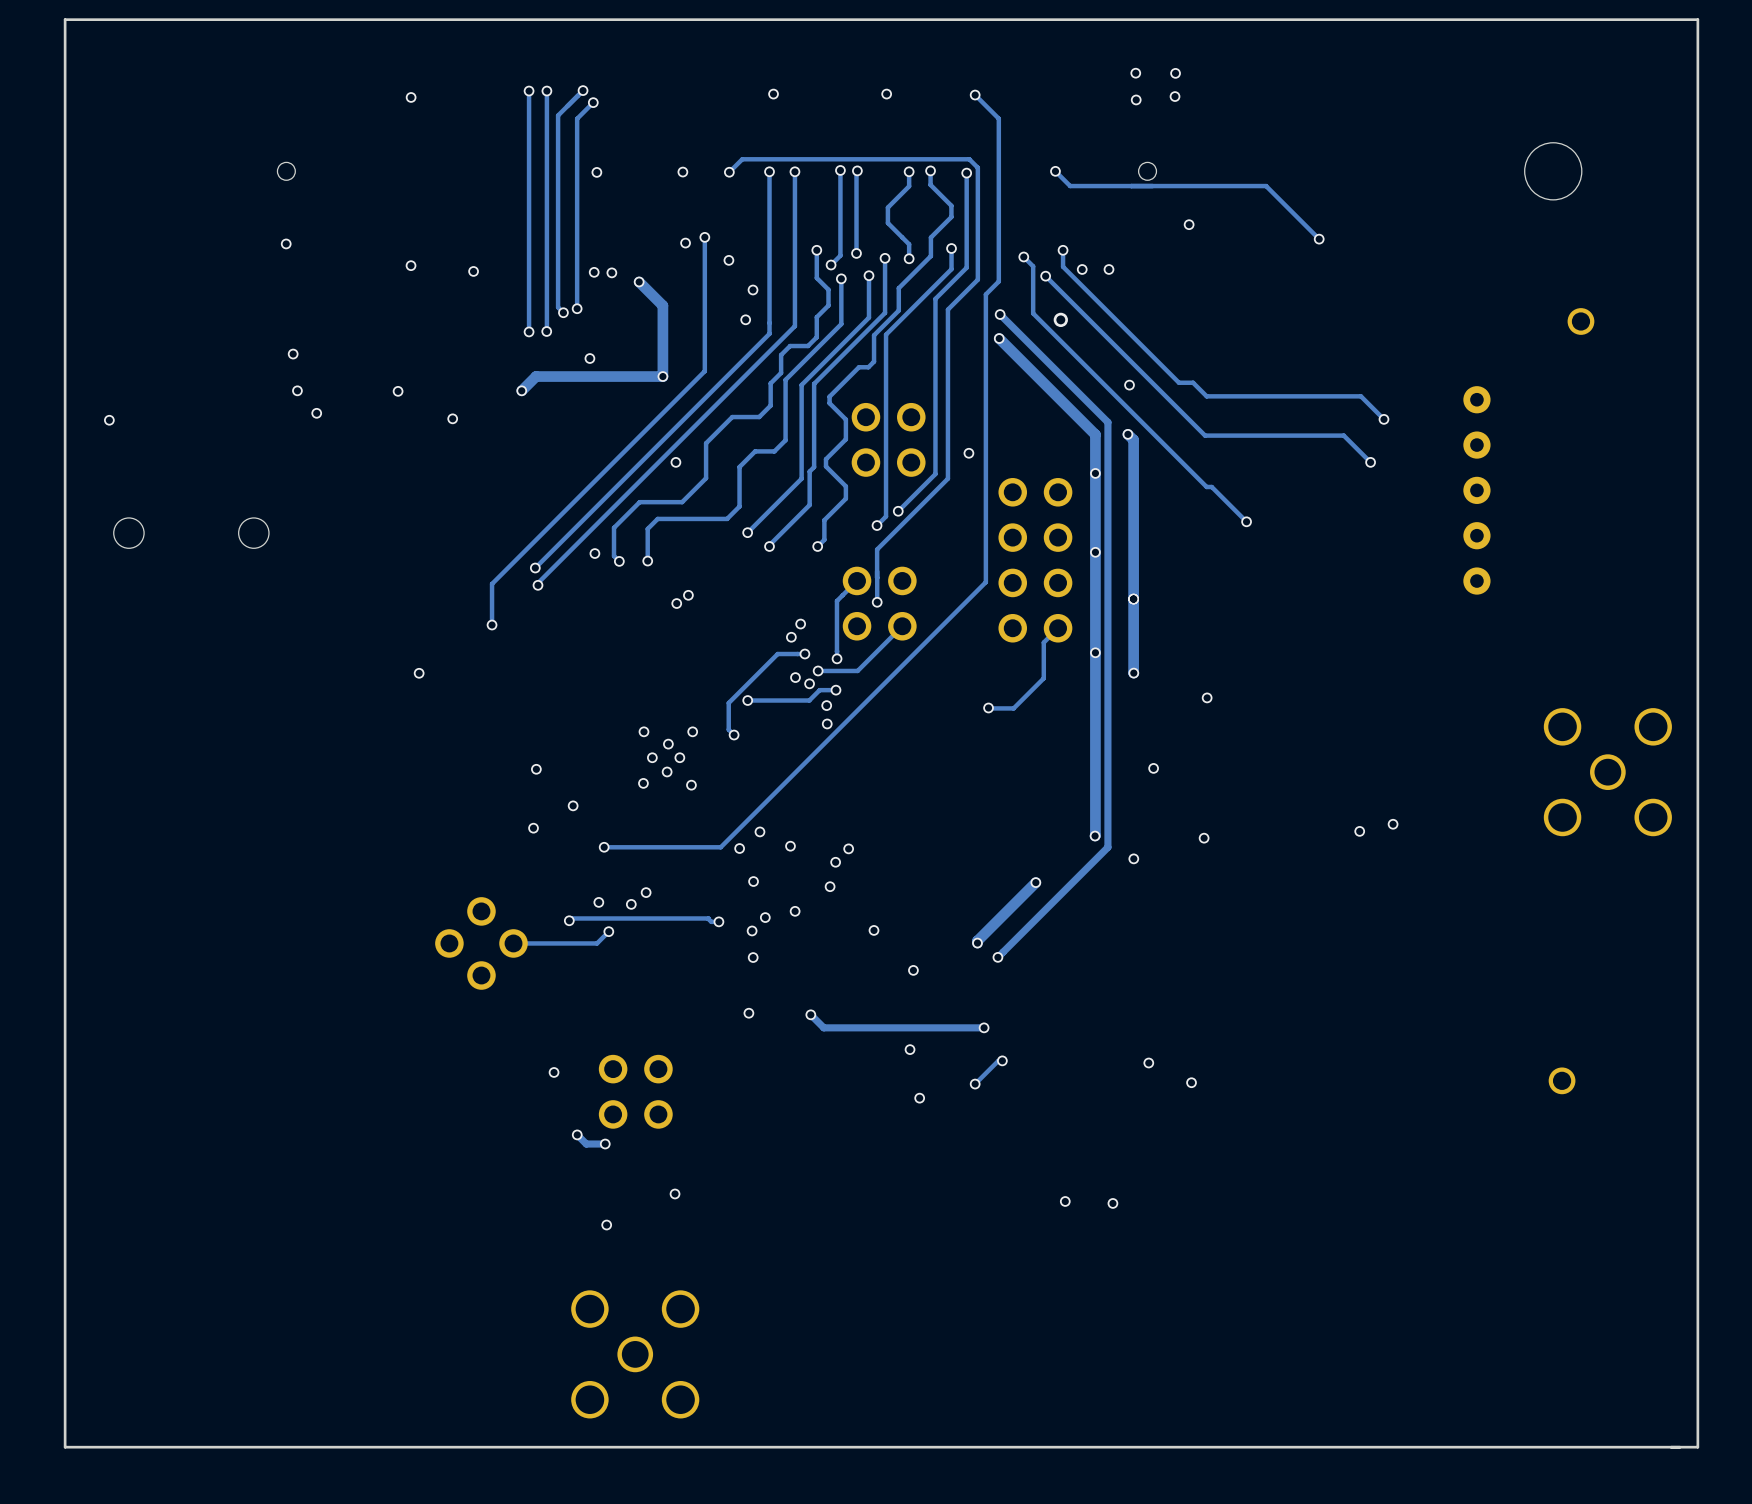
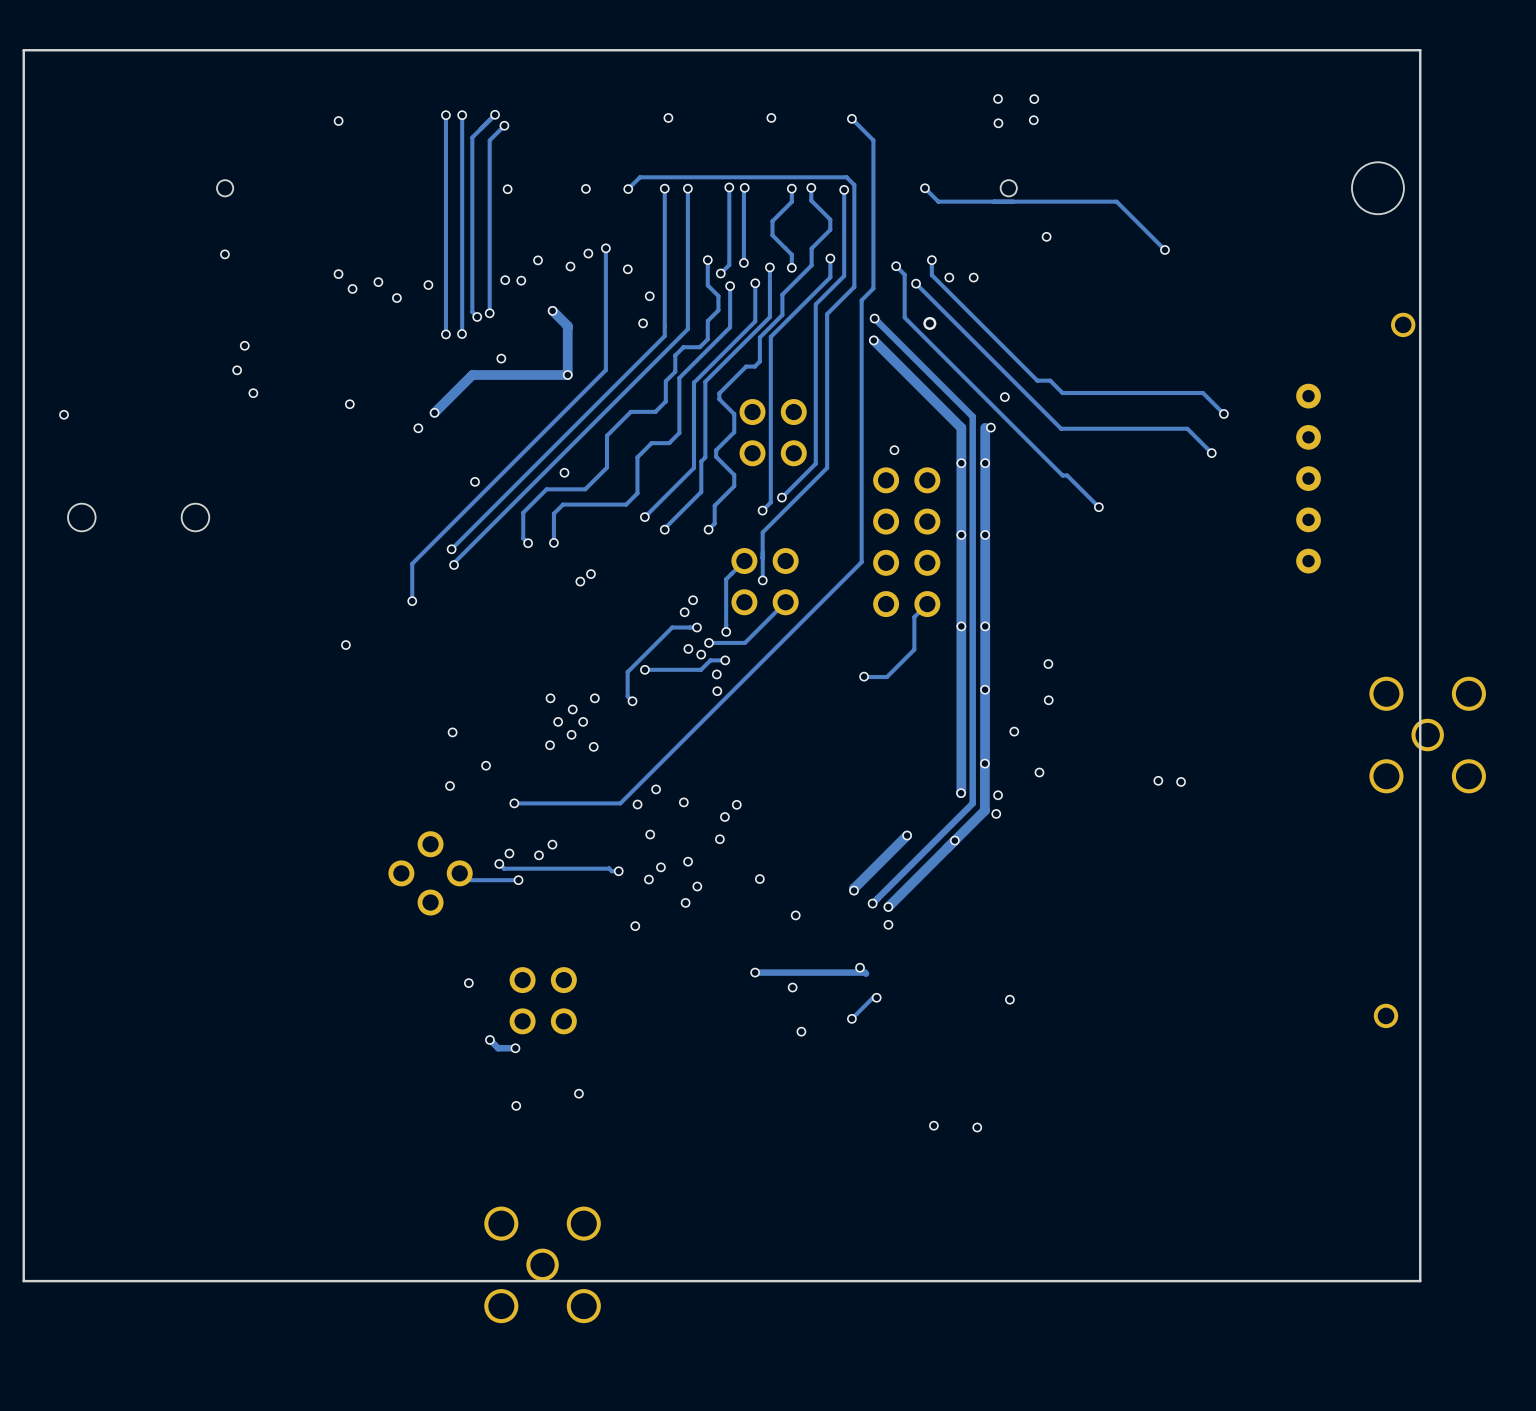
board edge: (1599, 19) (1697, 19) (1697, 1447) (65, 1447) (65, 1372) -> (1420, 50) (1420, 1281) (23, 1281)
via: none -> (538, 260)
via: none -> (570, 266)
via: (473, 271) -> none
via: none -> (378, 282)
via: none -> (428, 285)
via: none -> (352, 288)
track: (639, 281) (662, 305) (662, 322) -> (552, 310) (567, 325)
via: (639, 281) -> none
via: none -> (396, 298)
via: none -> (552, 310)
via: none -> (244, 345)
via: (293, 354) -> none
via: none -> (237, 370)
track: (558, 376) (536, 376) (521, 390) -> (472, 375) (434, 412)
via position: (1129, 385) -> (1004, 397)
via: (297, 390) -> none
via: (521, 390) -> none
via: (398, 391) -> none
via: none -> (253, 393)
via: none -> (349, 404)
via: (316, 413) -> none
via: (452, 418) -> none
via: none -> (434, 412)
track: none -> (985, 427) (985, 689)
track: (1127, 434) (1133, 440) (1133, 672) -> none
via: none -> (418, 428)
via position: (968, 453) -> (894, 450)
via position: (675, 462) -> (564, 472)
via: none -> (985, 463)
via: none -> (475, 481)
via: none -> (985, 534)
via: (594, 553) -> none
via: (1133, 599) -> none
via position: (1133, 673) -> (985, 626)
via position: (1207, 697) -> (1048, 664)
track: none -> (985, 689) (985, 763)
via: none -> (985, 689)
via: none -> (1048, 700)
track: none -> (984, 763) (984, 810) (888, 906)
via: none -> (984, 763)
via: none -> (1158, 780)
via: (1393, 824) -> none
via position: (1359, 831) -> (1181, 781)
via: none -> (998, 795)
via position: (1204, 838) -> (1039, 772)
via: none -> (954, 840)
track: (708, 918) (571, 918) (569, 920) -> (609, 868) (504, 868) (499, 863)
via position: (569, 920) -> (499, 863)
track: (608, 931) (597, 943) (513, 943) -> (518, 880) (466, 880) (459, 873)
via: none -> (697, 886)
part position: (481, 943) -> (430, 873)
via: none -> (685, 902)
via: (753, 957) -> none
via: none -> (888, 906)
via: none -> (888, 924)
via: none -> (635, 926)
via: (748, 1013) -> none
track: (810, 1014) (823, 1027) (984, 1027) -> none
via: (810, 1014) -> none
track: none -> (755, 972) (866, 973)
via: none -> (755, 972)
via: none -> (468, 983)
via: (554, 1072) -> none
via: (1191, 1082) -> none
part position: (635, 1091) -> (543, 1000)
via: none -> (489, 1039)
via: none -> (515, 1048)
track: (577, 1134) (586, 1144) (605, 1144) -> (489, 1039) (498, 1048) (515, 1048)
via: (577, 1134) -> none
via: (605, 1144) -> none
via: none -> (516, 1105)
via position: (675, 1193) -> (578, 1093)
via: (606, 1225) -> none

